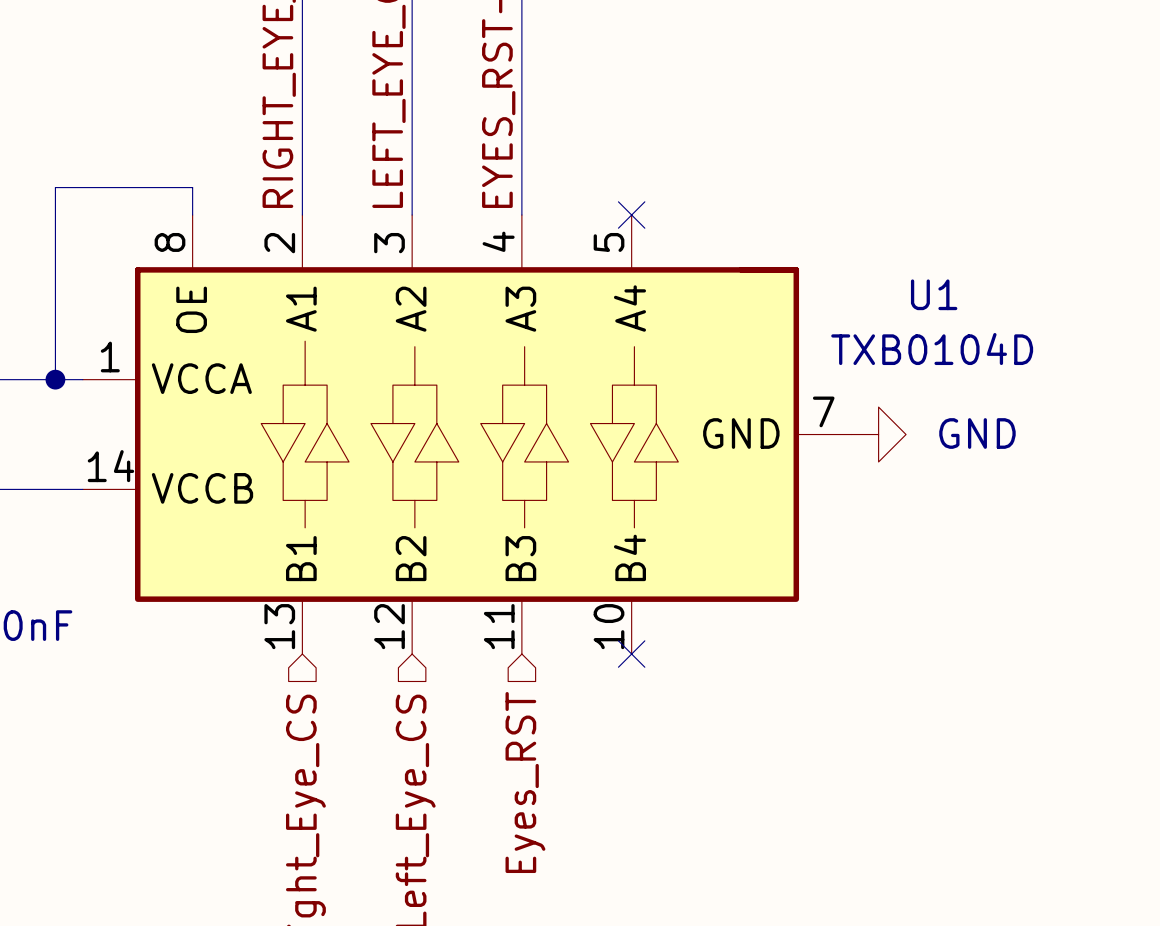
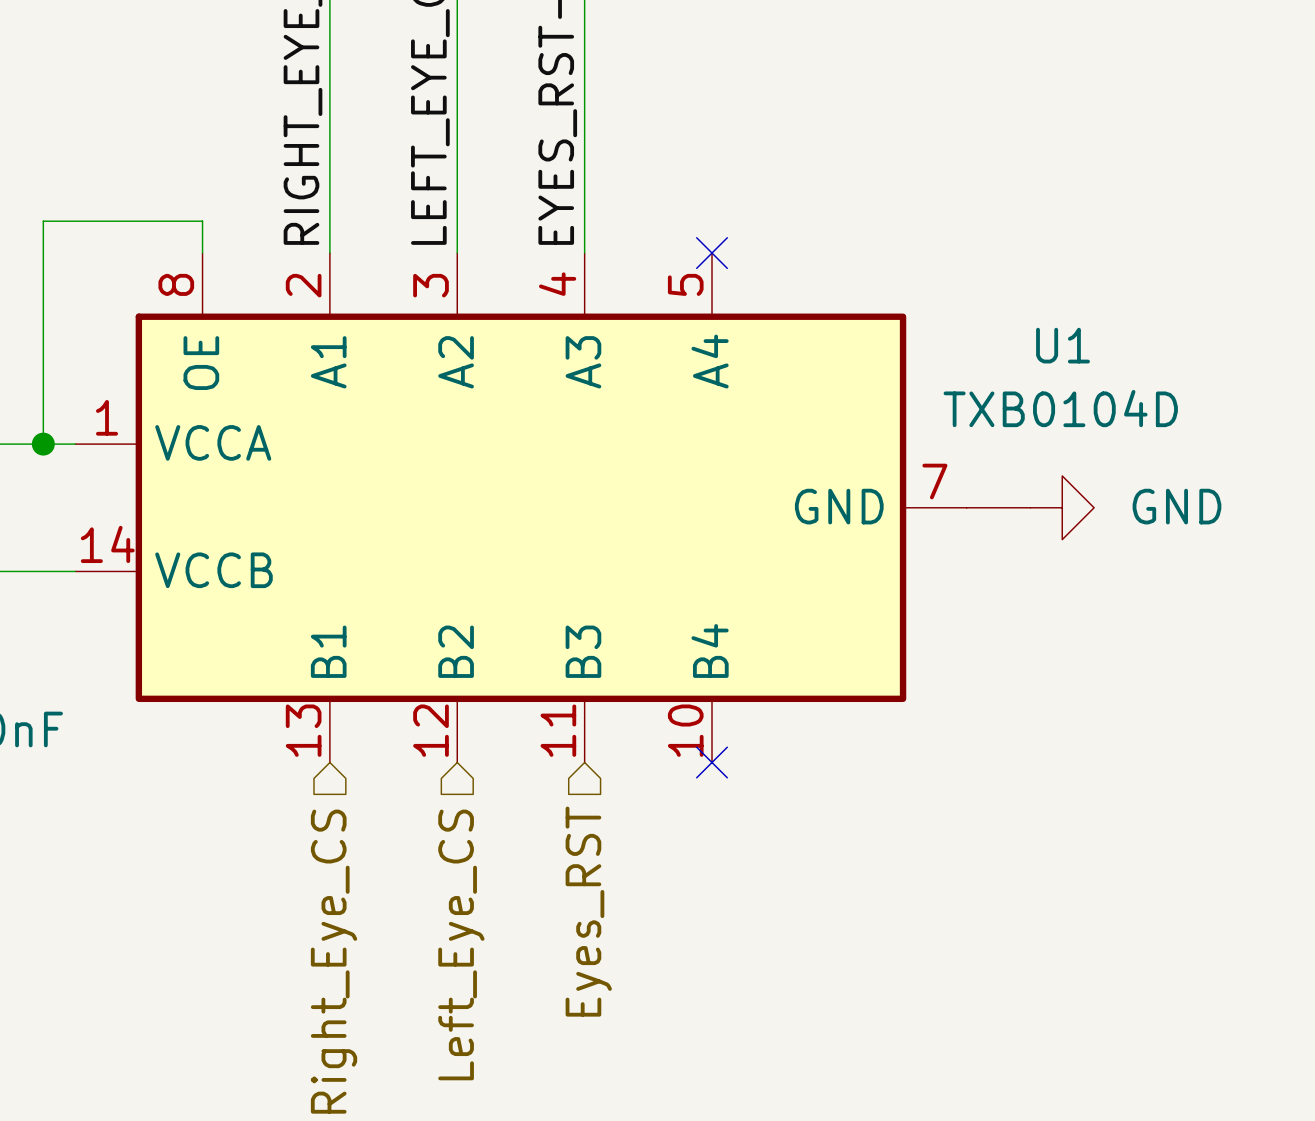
U1 symbol: [82, 215, 852, 655] -> [75, 253, 967, 763]
power symbol: GND (878, 434) -> none
power symbol: none -> GND (1030, 507)

